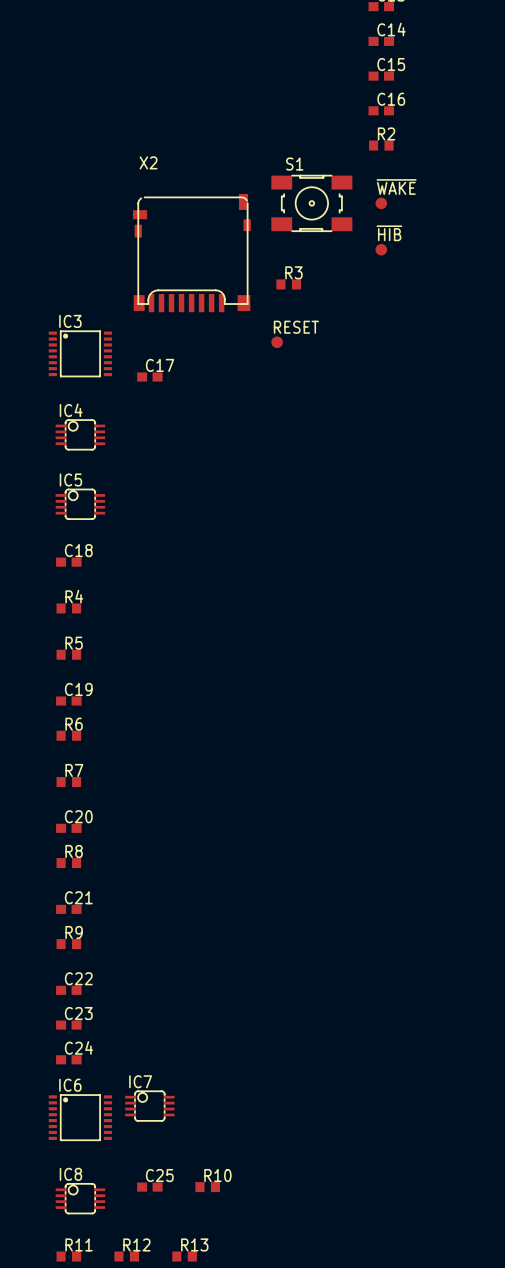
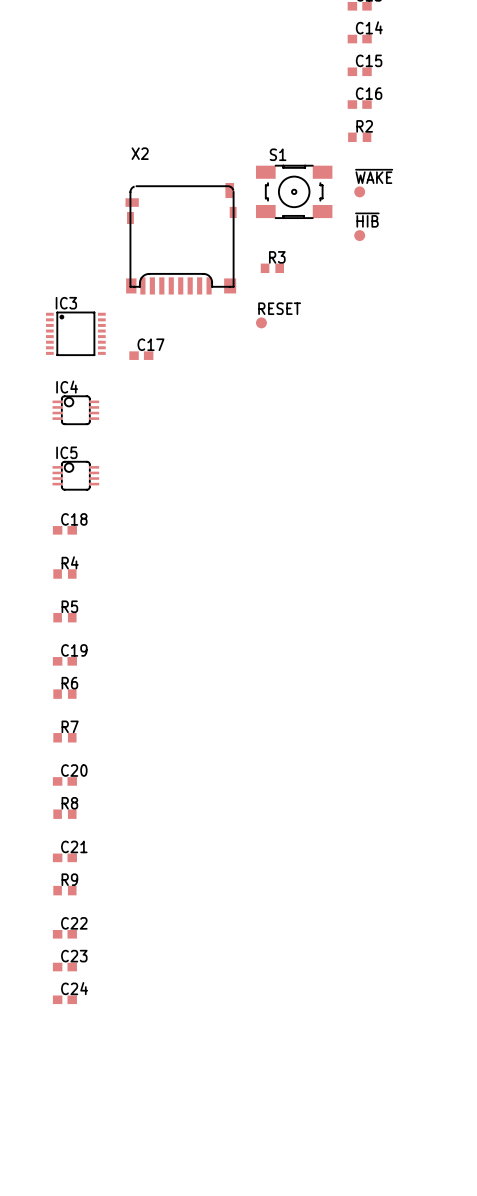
IC7: (149, 1106) -> none
IC6: (80, 1117) -> none
C25: (149, 1187) -> none
R10: (207, 1187) -> none
IC8: (80, 1198) -> none
R11: (68, 1256) -> none
R12: (126, 1256) -> none
R13: (184, 1256) -> none

